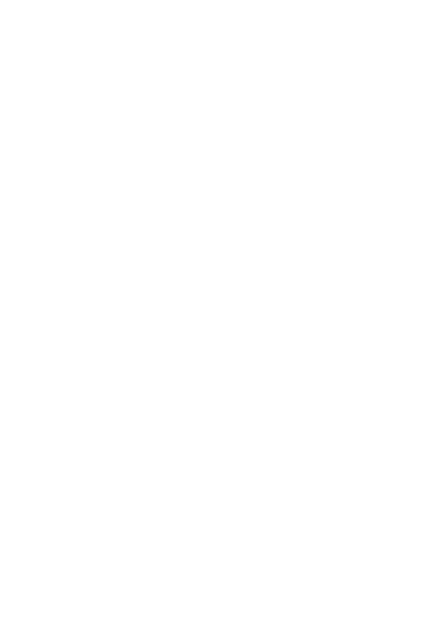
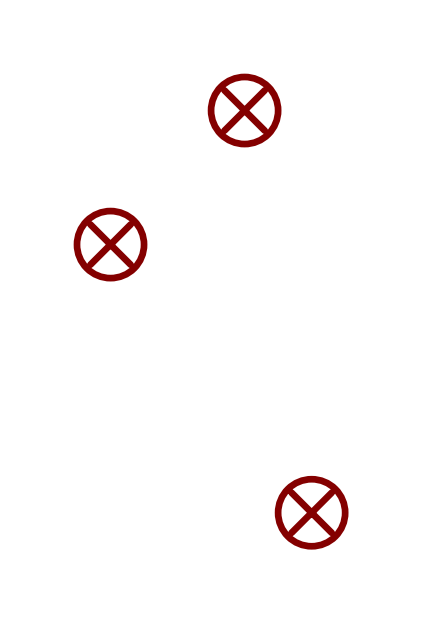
part: none -> (244, 110)
part: none -> (110, 244)
part: none -> (311, 512)

